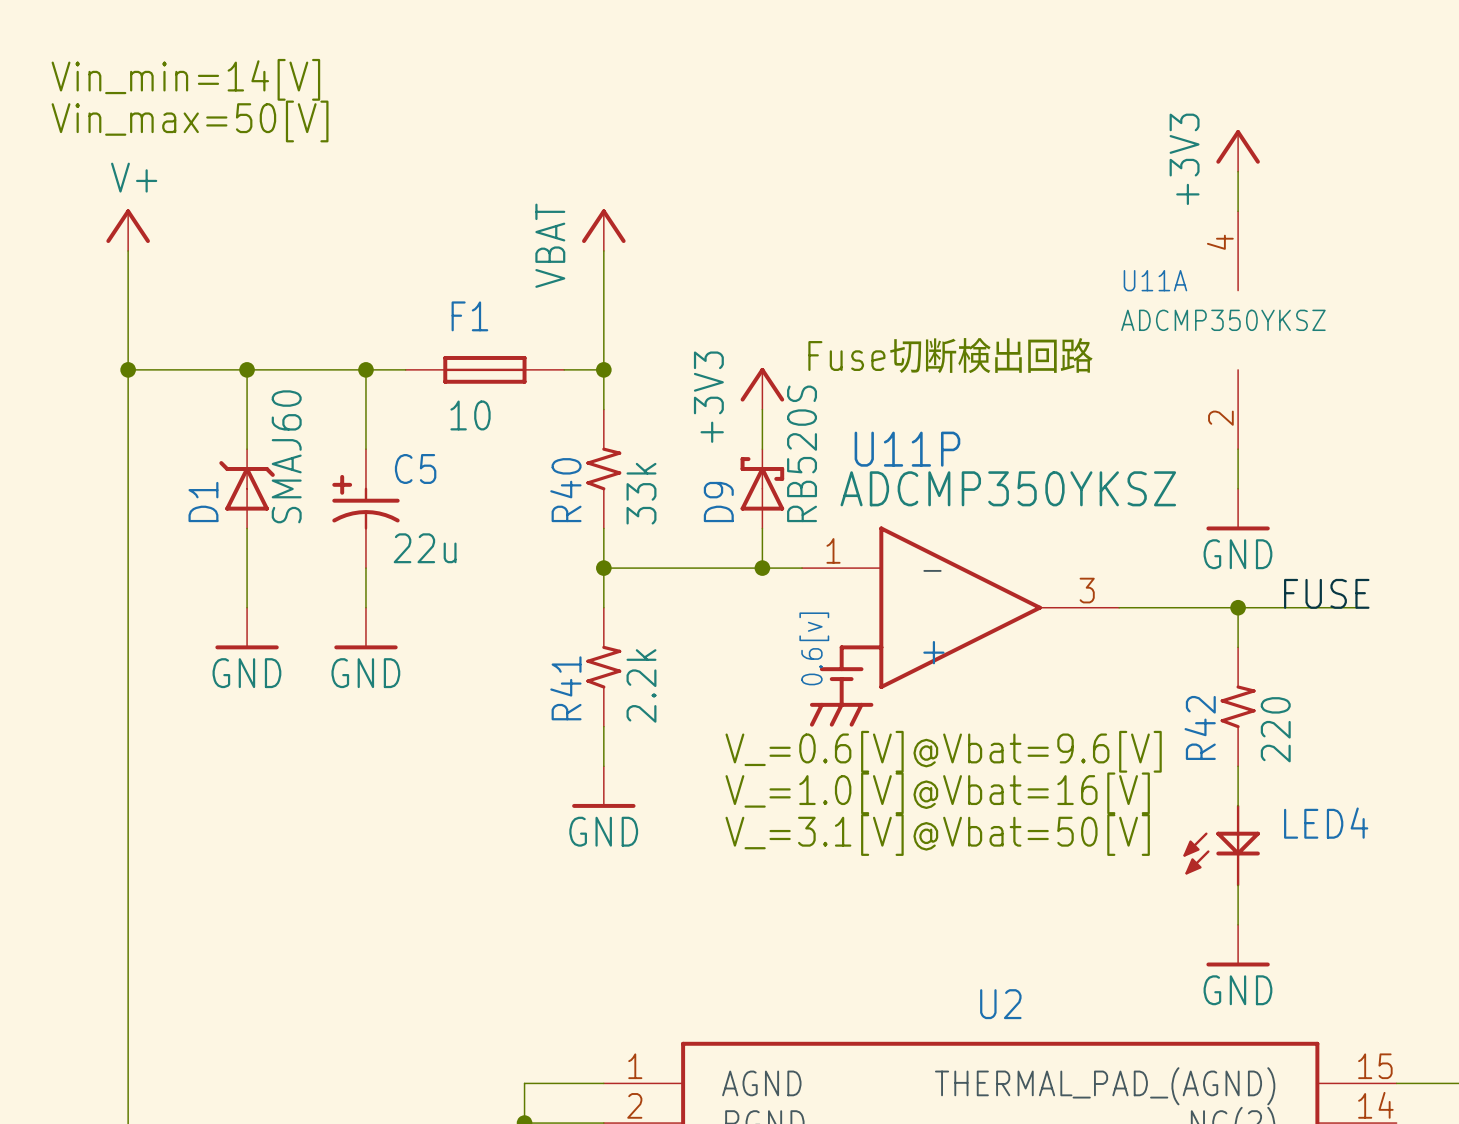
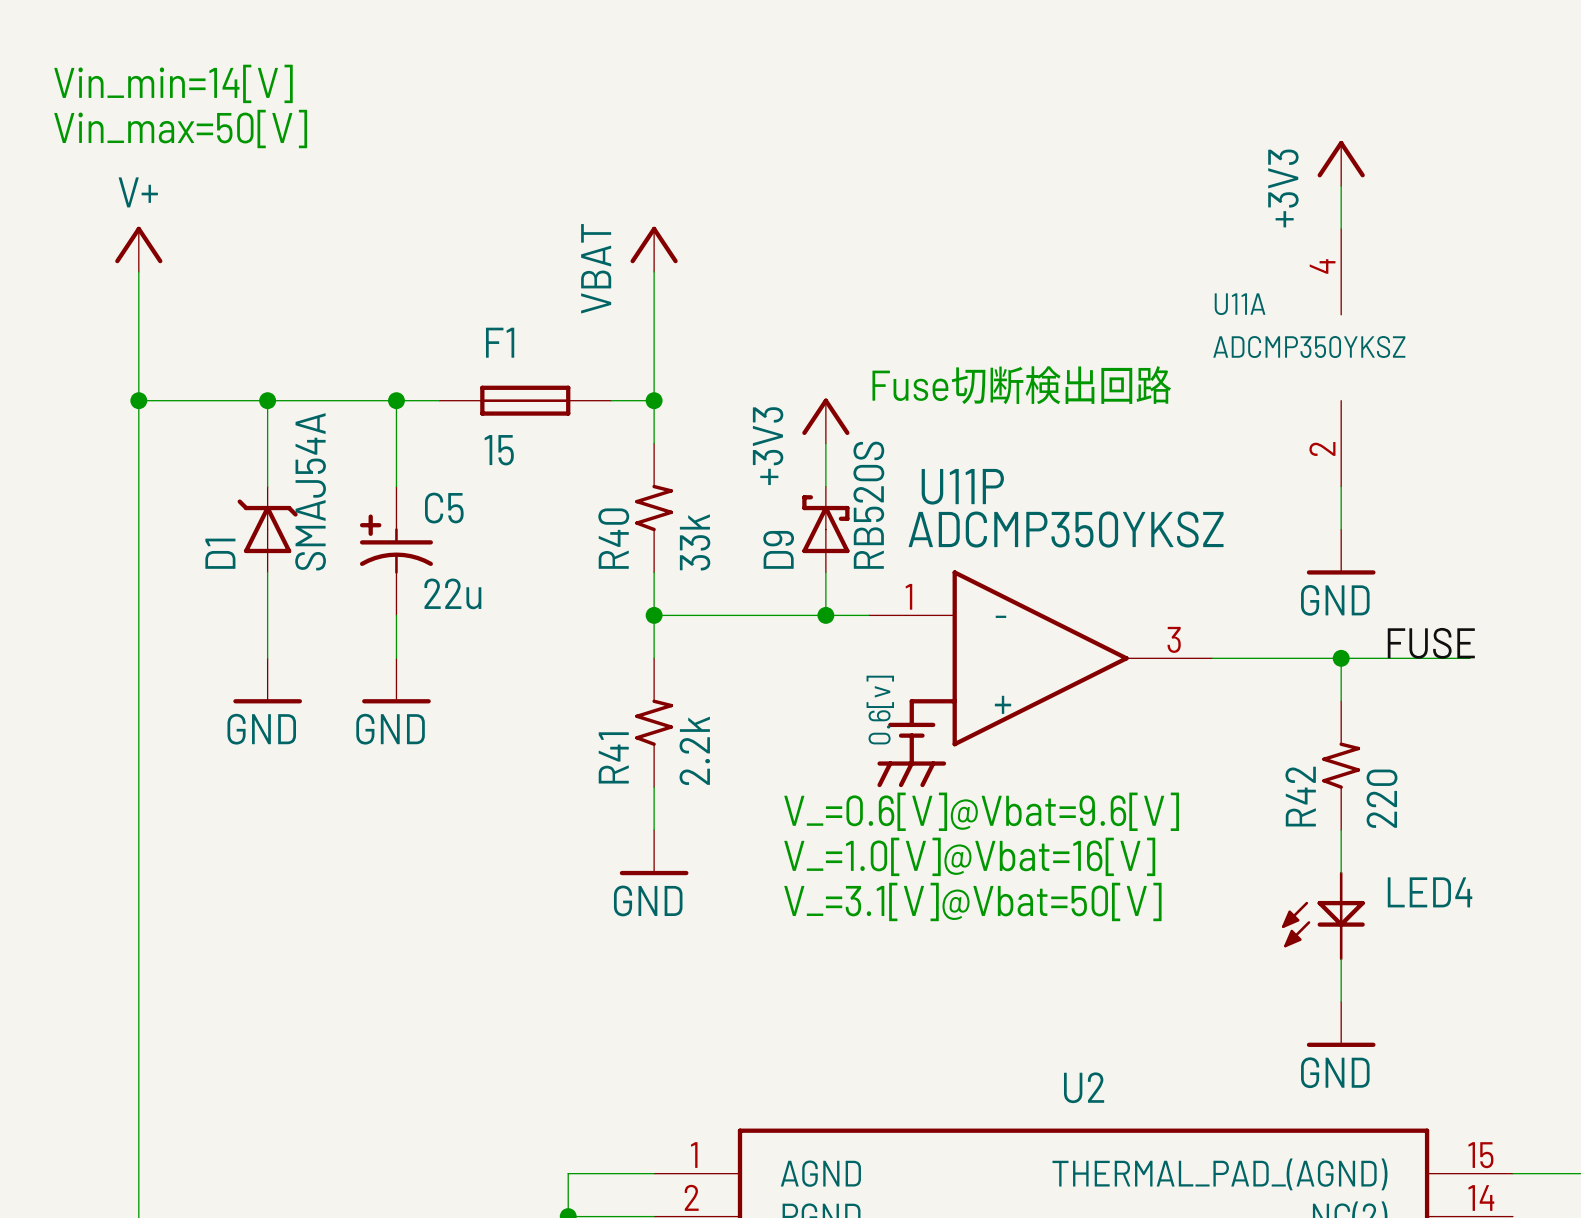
F1 value: 10 (470, 415) -> 15 (499, 450)
D1 value: SMAJ60 (286, 456) -> SMAJ54A (310, 491)

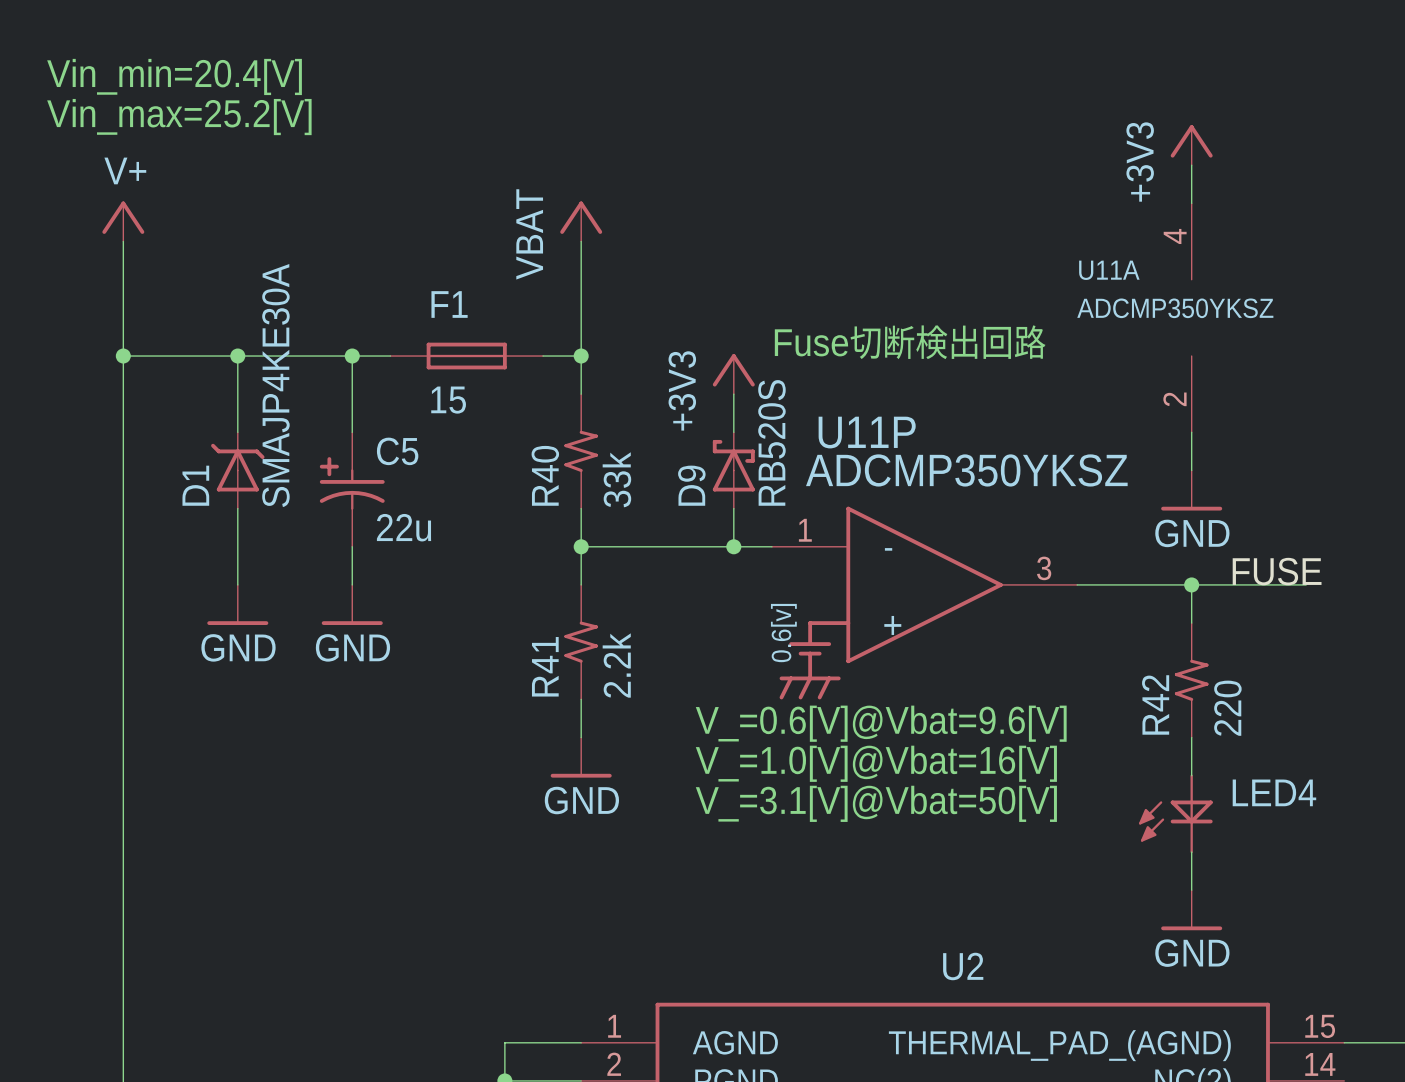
text: Vin_min=14[V] (173, 83) -> Vin_min=20.4[V] (174, 76)
text: Vin_max=50[V] (180, 129) -> Vin_max=25.2[V] (179, 117)
D1 value: SMAJ54A (310, 491) -> SMAJP4KE30A (275, 385)

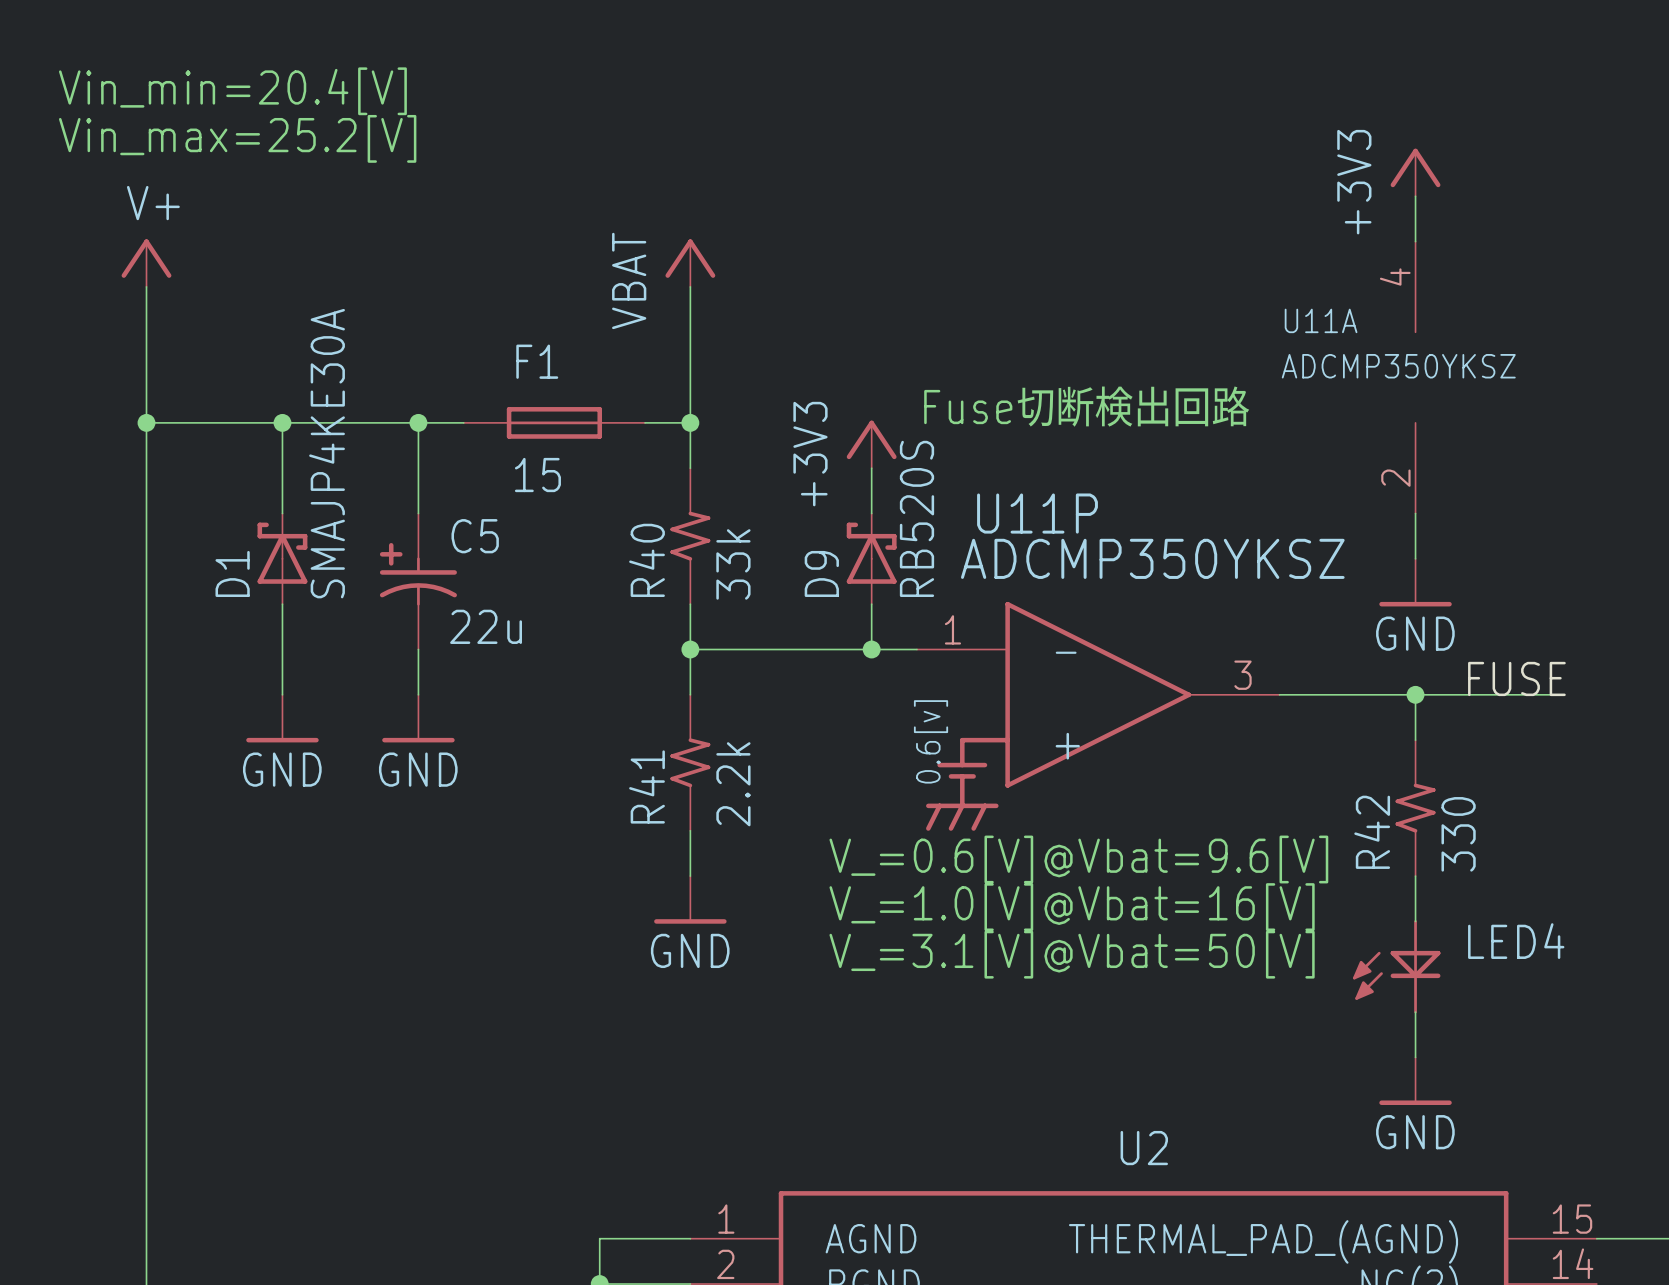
D1 symbol: [211, 432, 265, 509] -> [257, 513, 308, 605]
R42 value: 220 (1227, 708) -> 330 (1458, 834)

